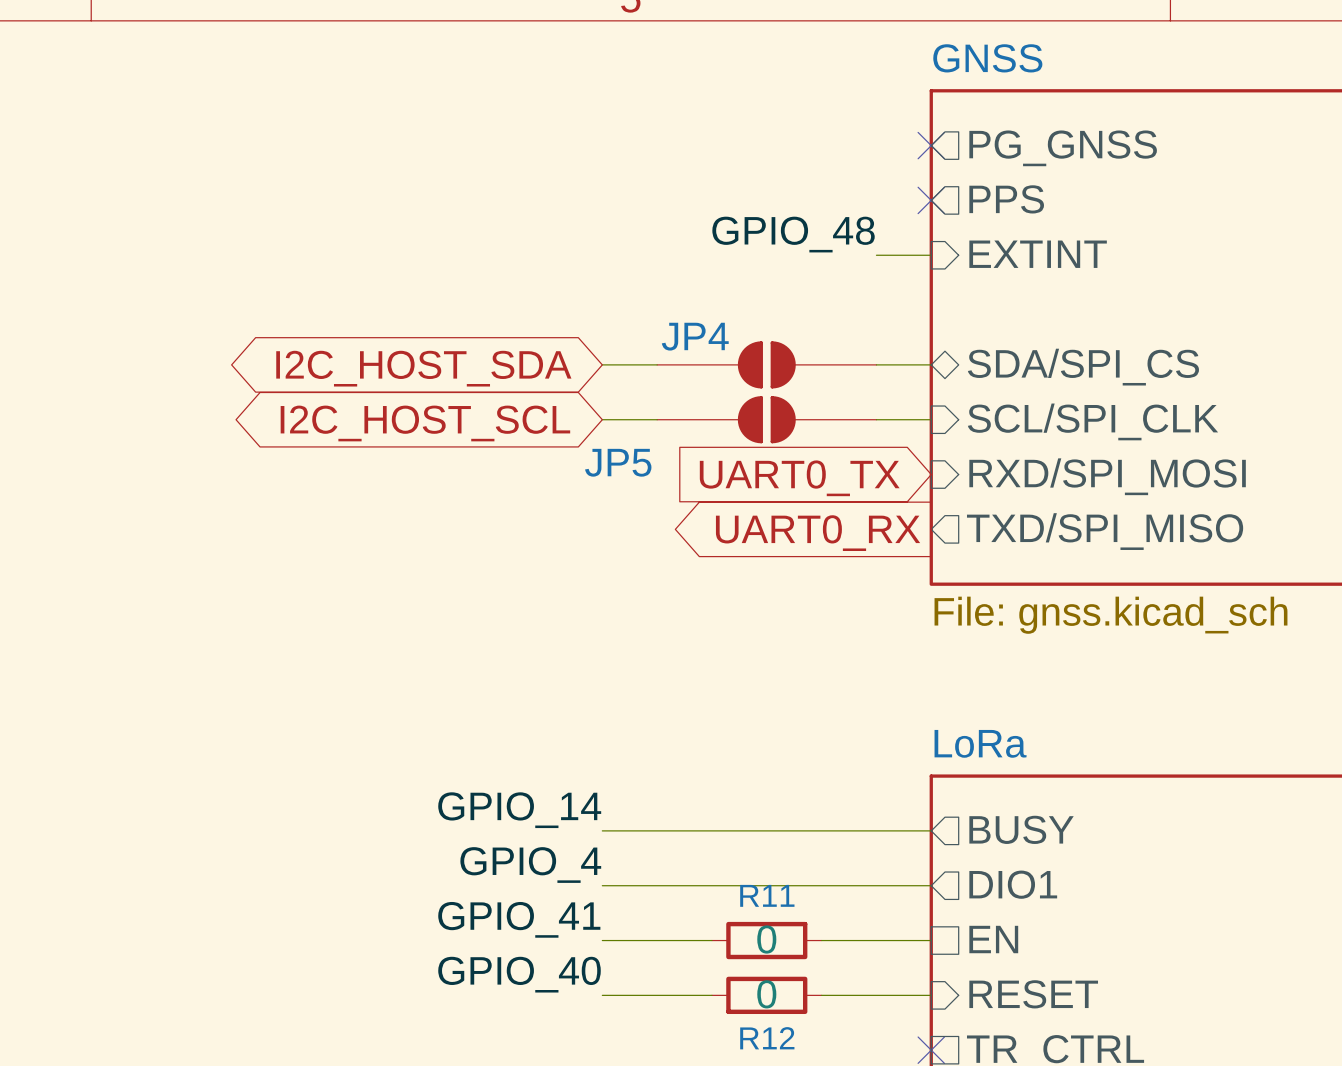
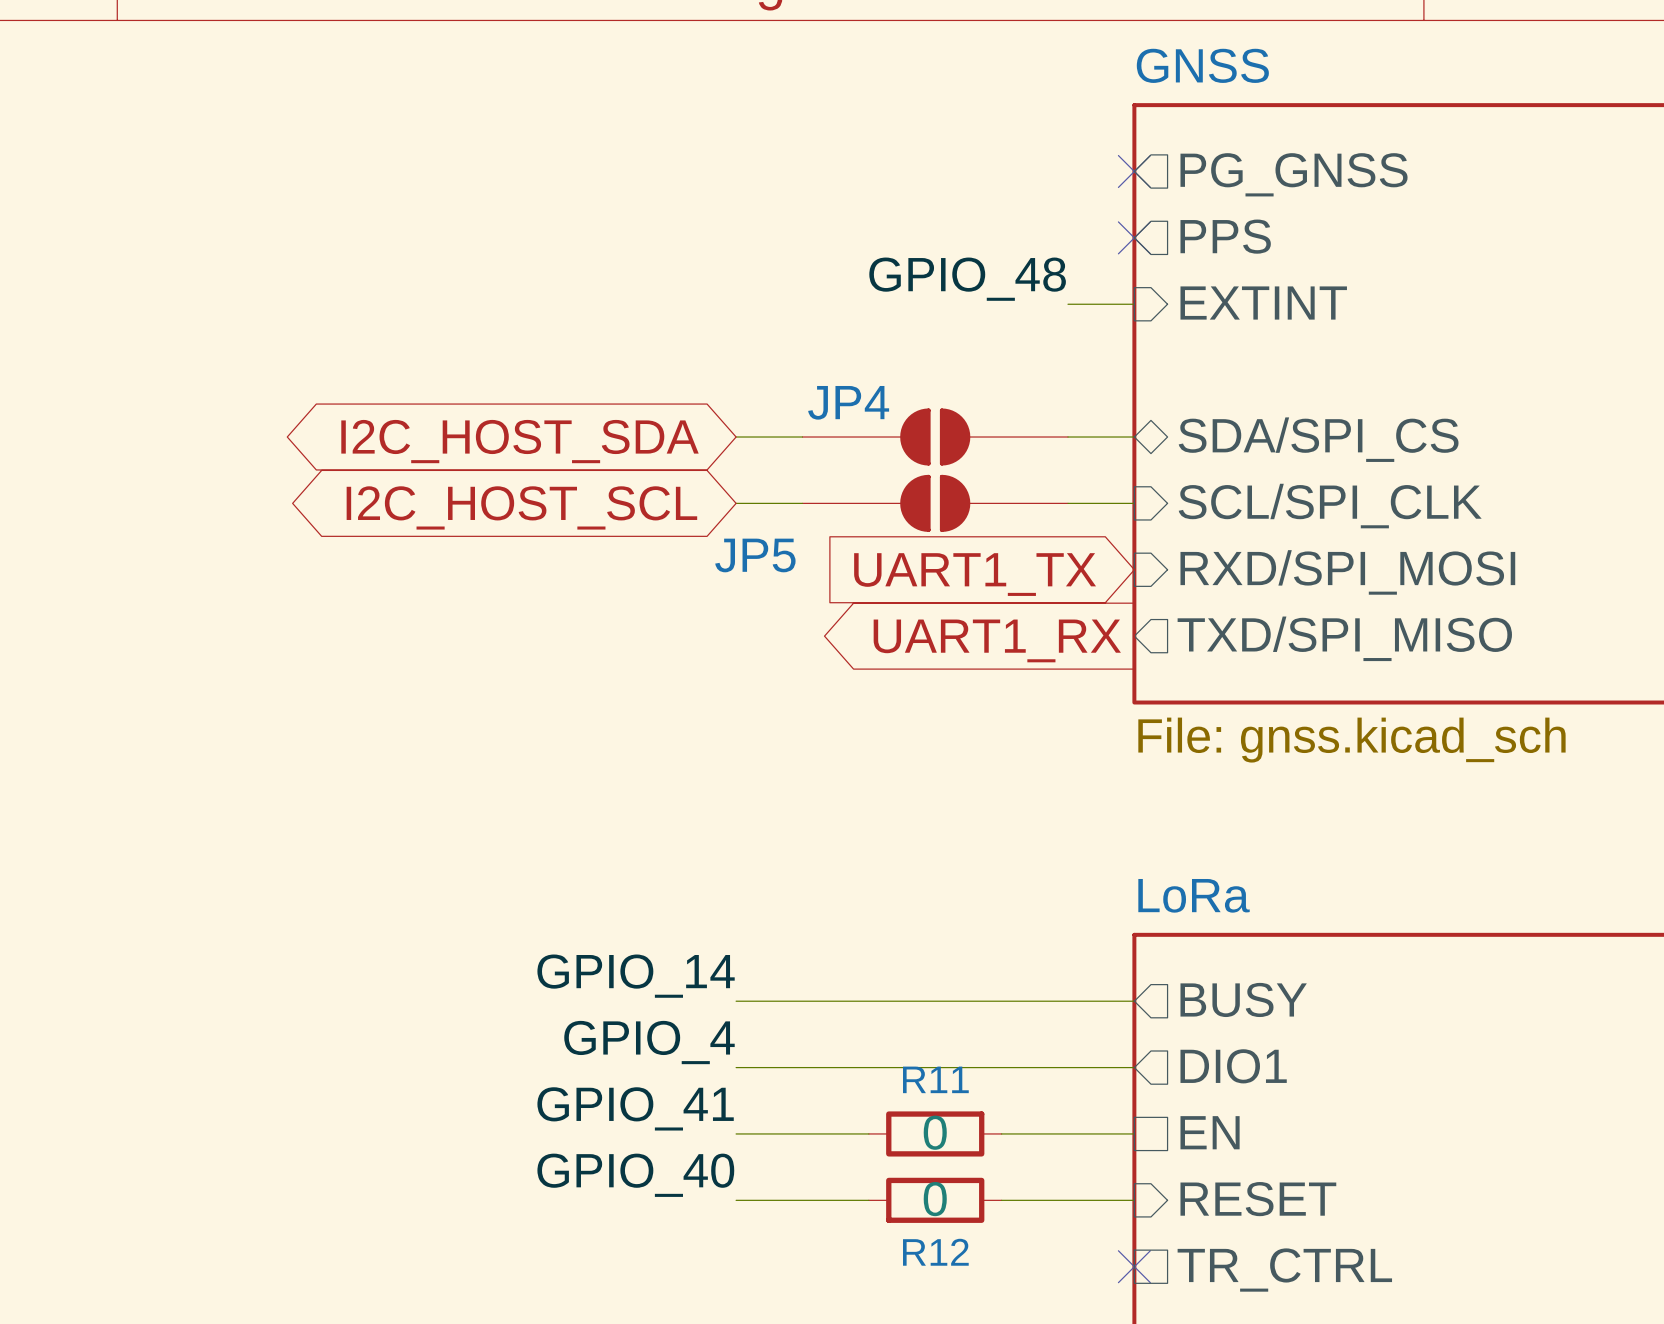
global label: UART0_TX (799, 478) -> UART1_TX (975, 574)
global label: UART0_RX (818, 533) -> UART1_RX (997, 640)

